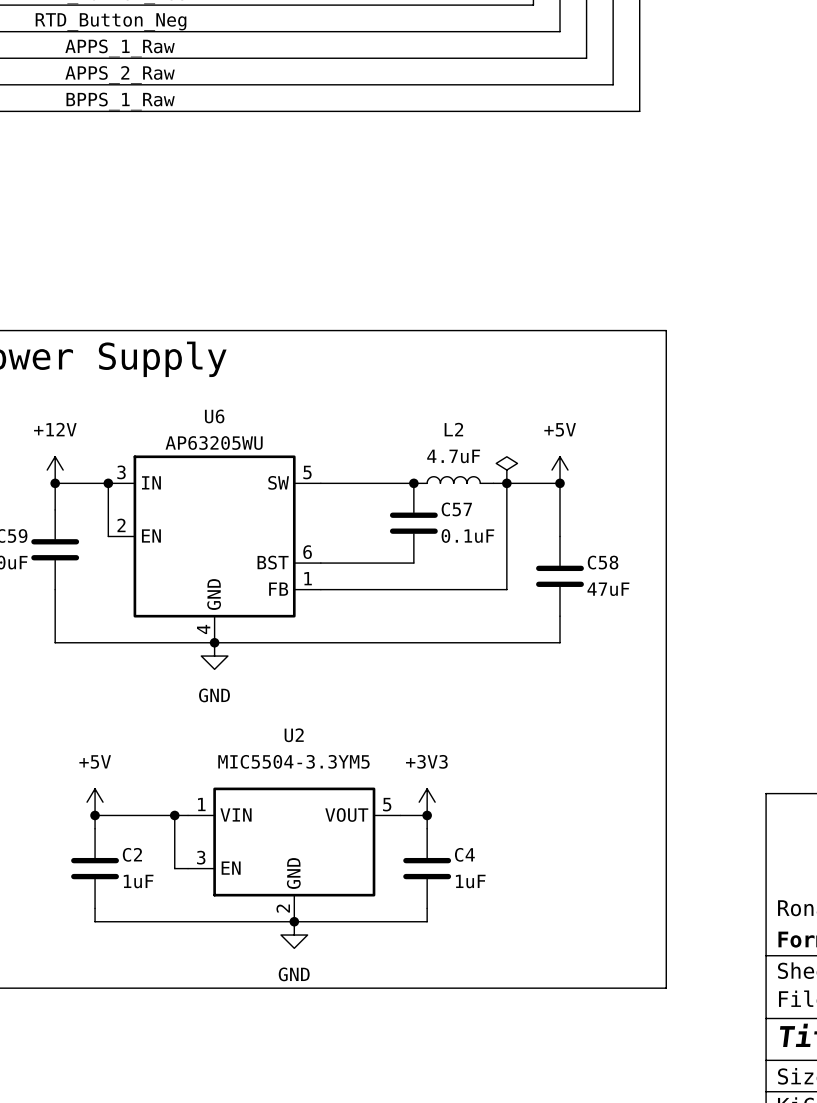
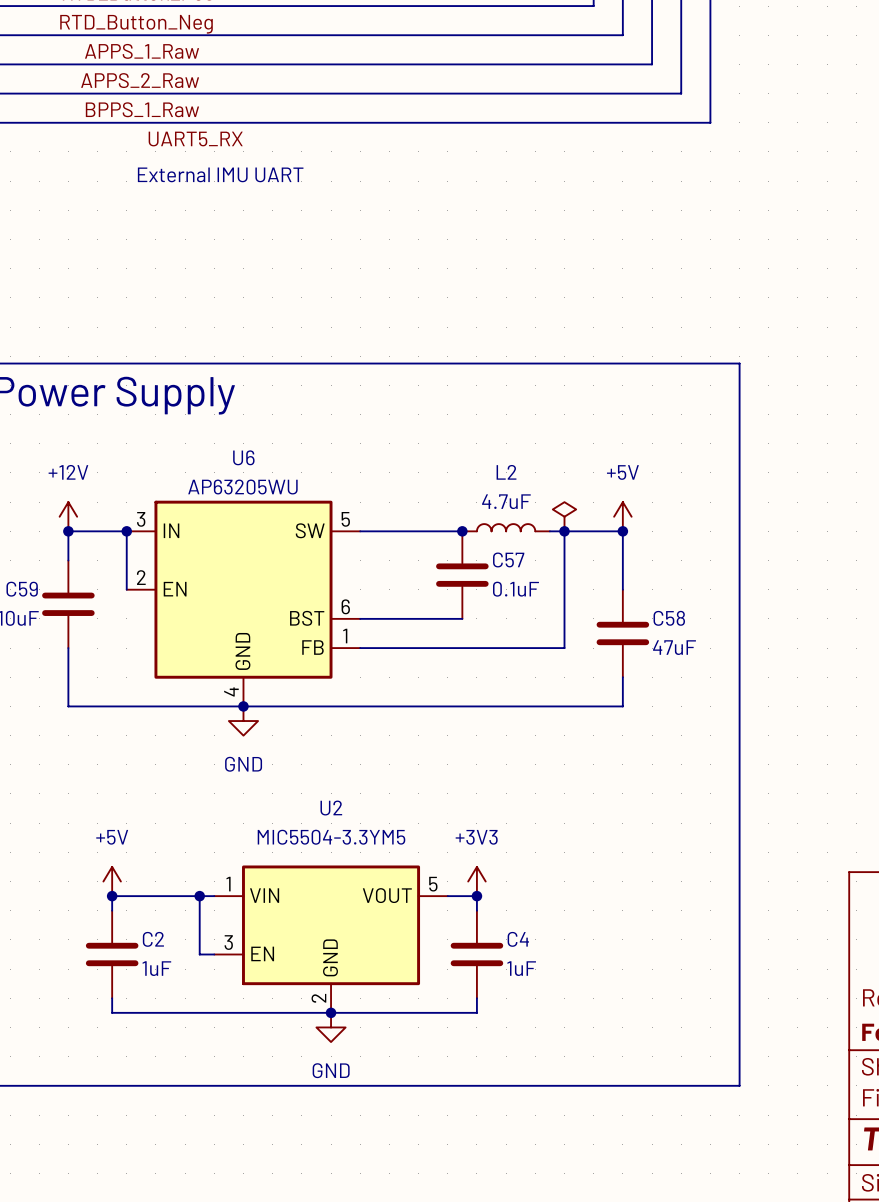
label: none -> UART5_RX (195, 139)
text: none -> External IMU UART (220, 174)

